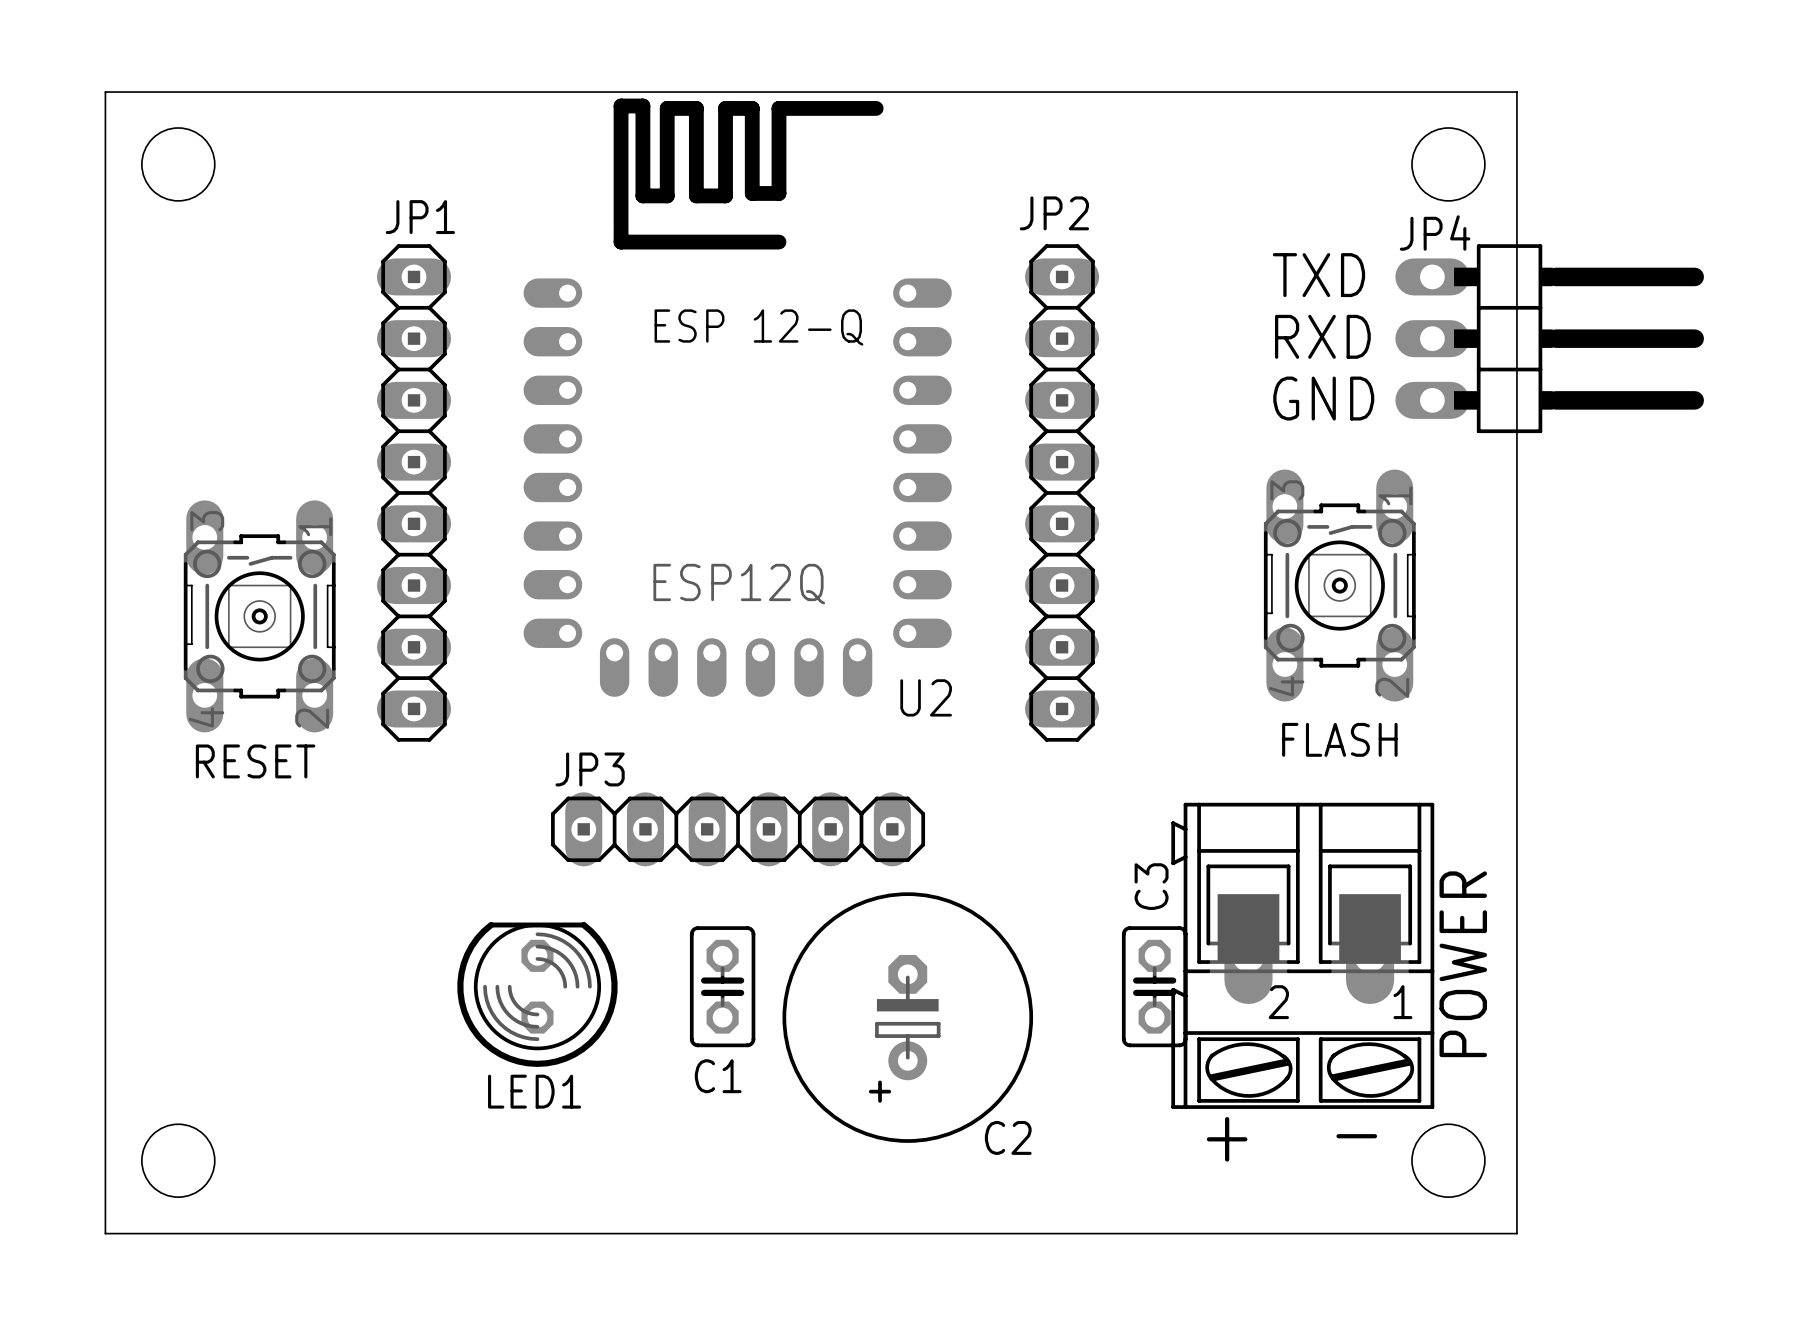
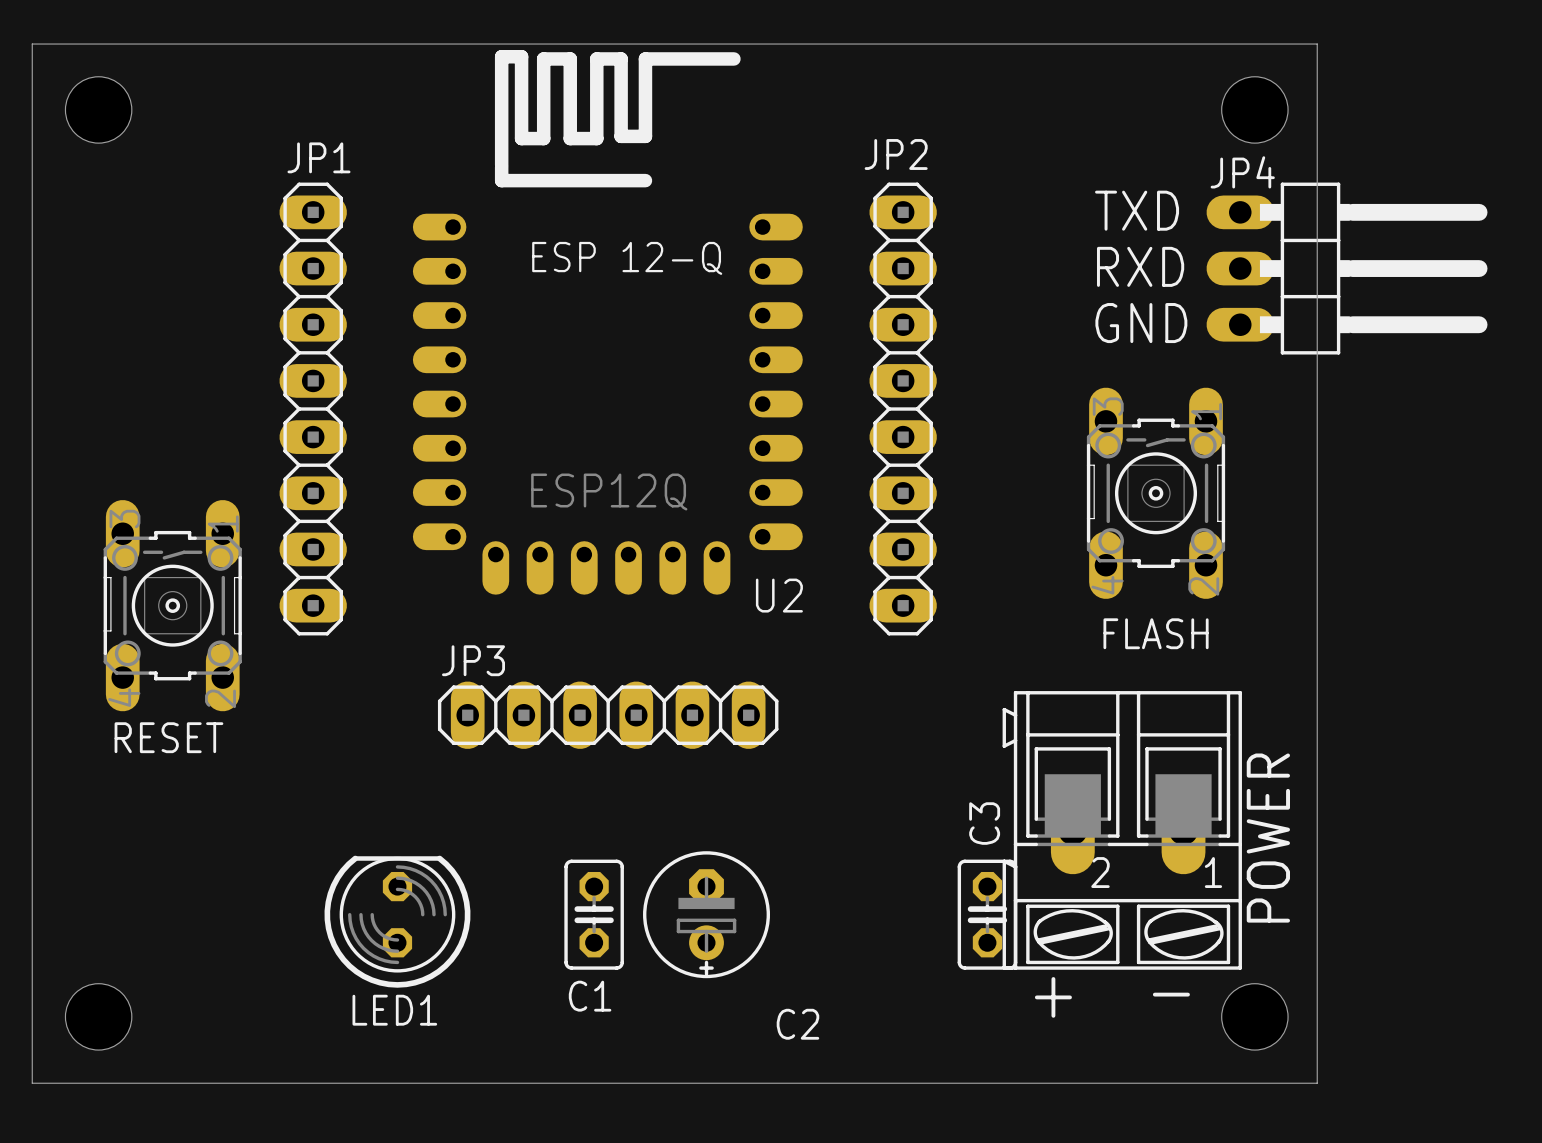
RESET position: (259, 616) -> (172, 605)
C2 footprint: [782, 892, 1034, 1143] -> [643, 851, 771, 979]
C1 position: (722, 986) -> (594, 914)
C3 position: (1154, 986) -> (987, 914)
LED1 position: (537, 994) -> (397, 921)

